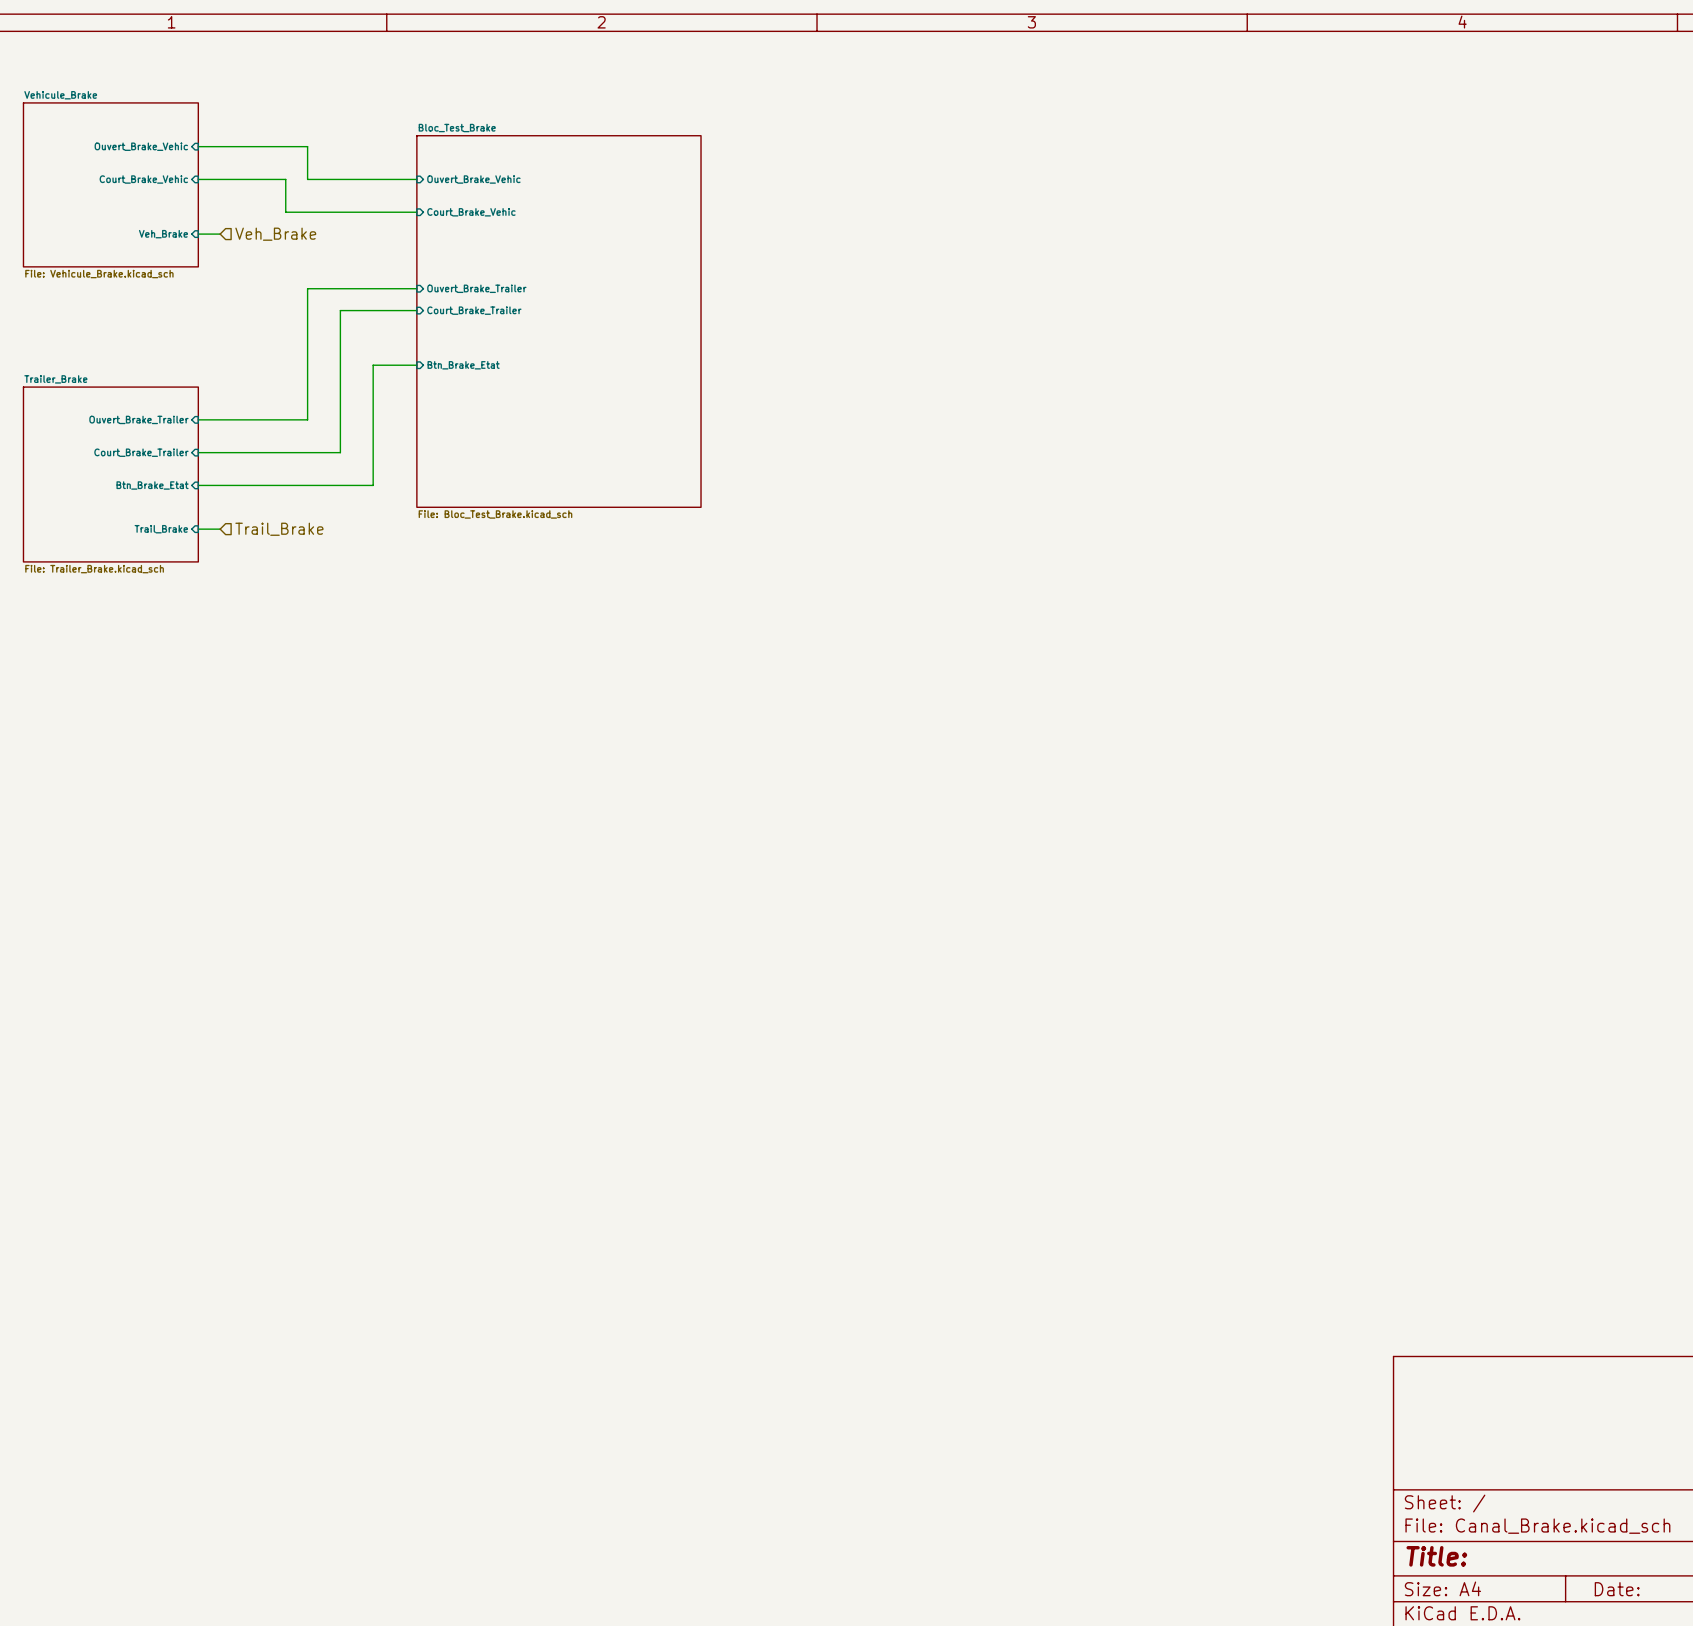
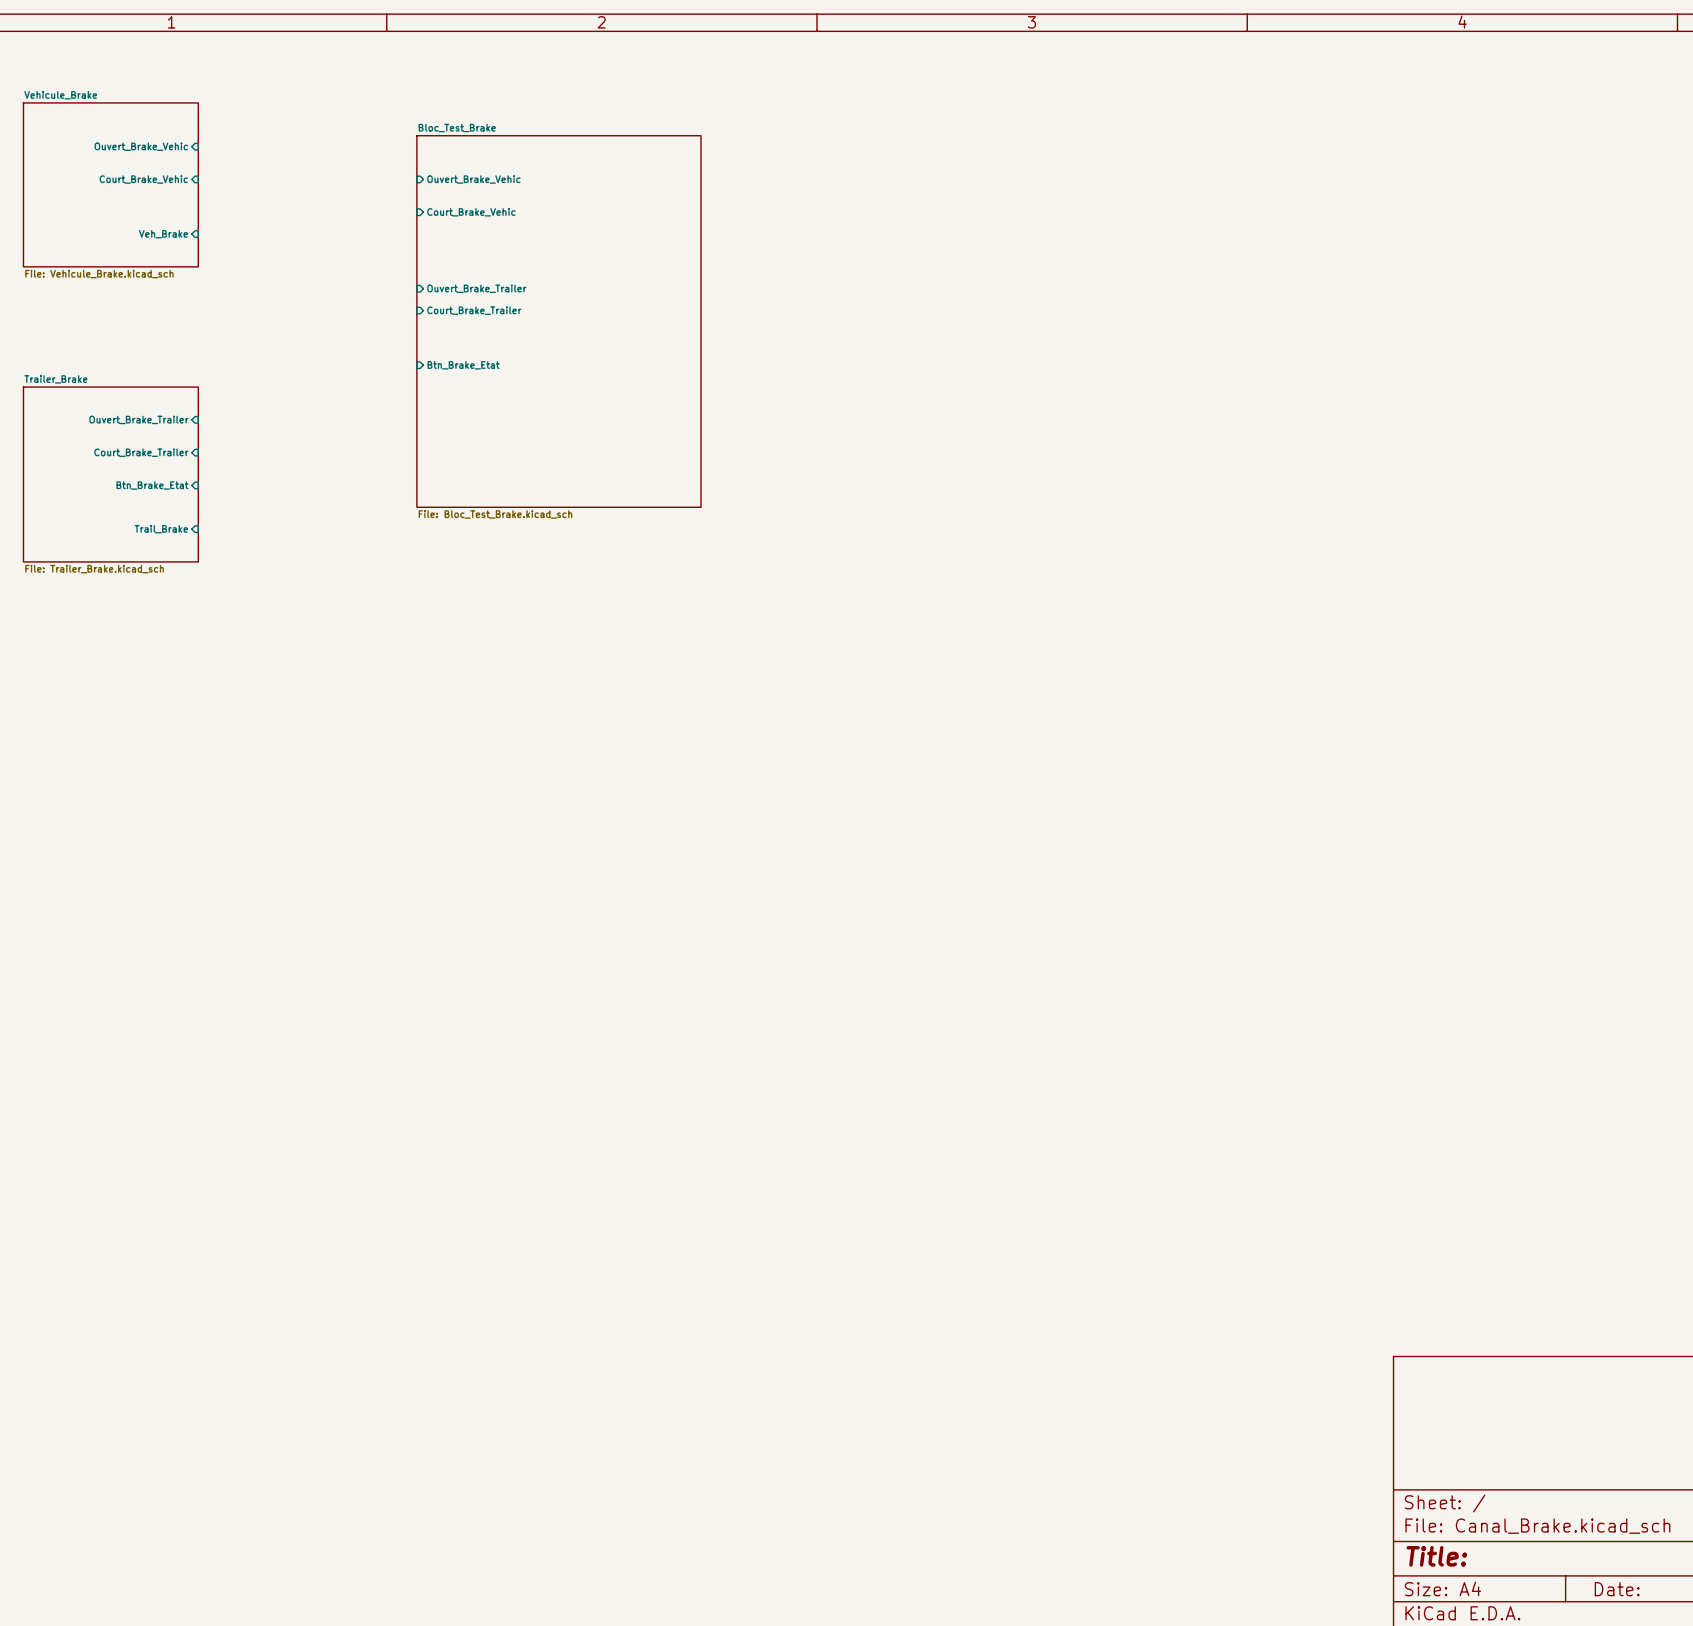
wire: (198, 146) (307, 146) (307, 179) (416, 179) -> none
wire: (198, 179) (285, 179) (285, 212) (416, 212) -> none
wire: (198, 234) (220, 234) -> none
hierarchical label: Veh_Brake (275, 234) -> none
wire: (416, 288) (307, 288) (307, 419) (198, 419) -> none
wire: (416, 310) (340, 310) (340, 452) (198, 452) -> none
wire: (416, 365) (373, 365) (373, 485) (198, 485) -> none
wire: (198, 529) (220, 529) -> none
hierarchical label: Trail_Brake (279, 529) -> none

